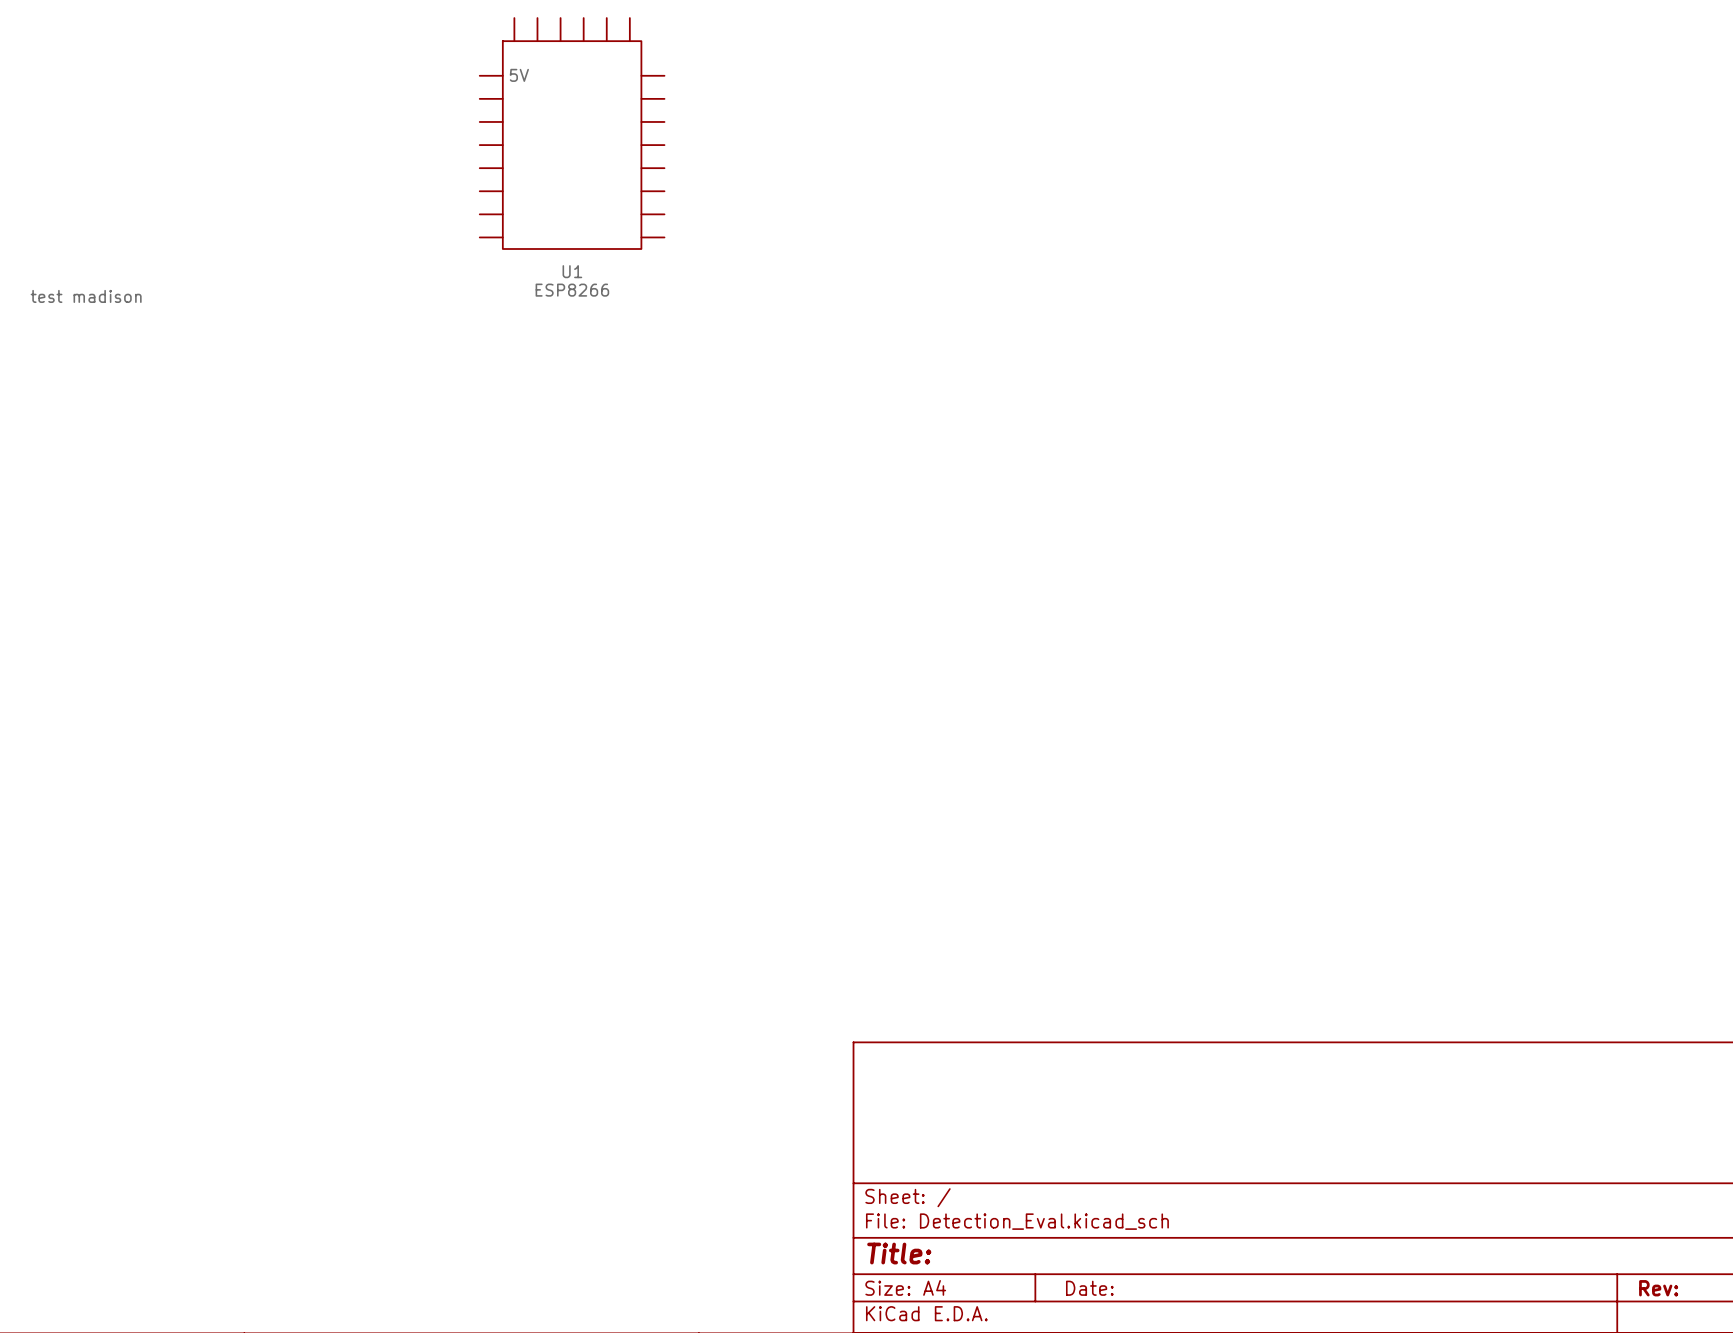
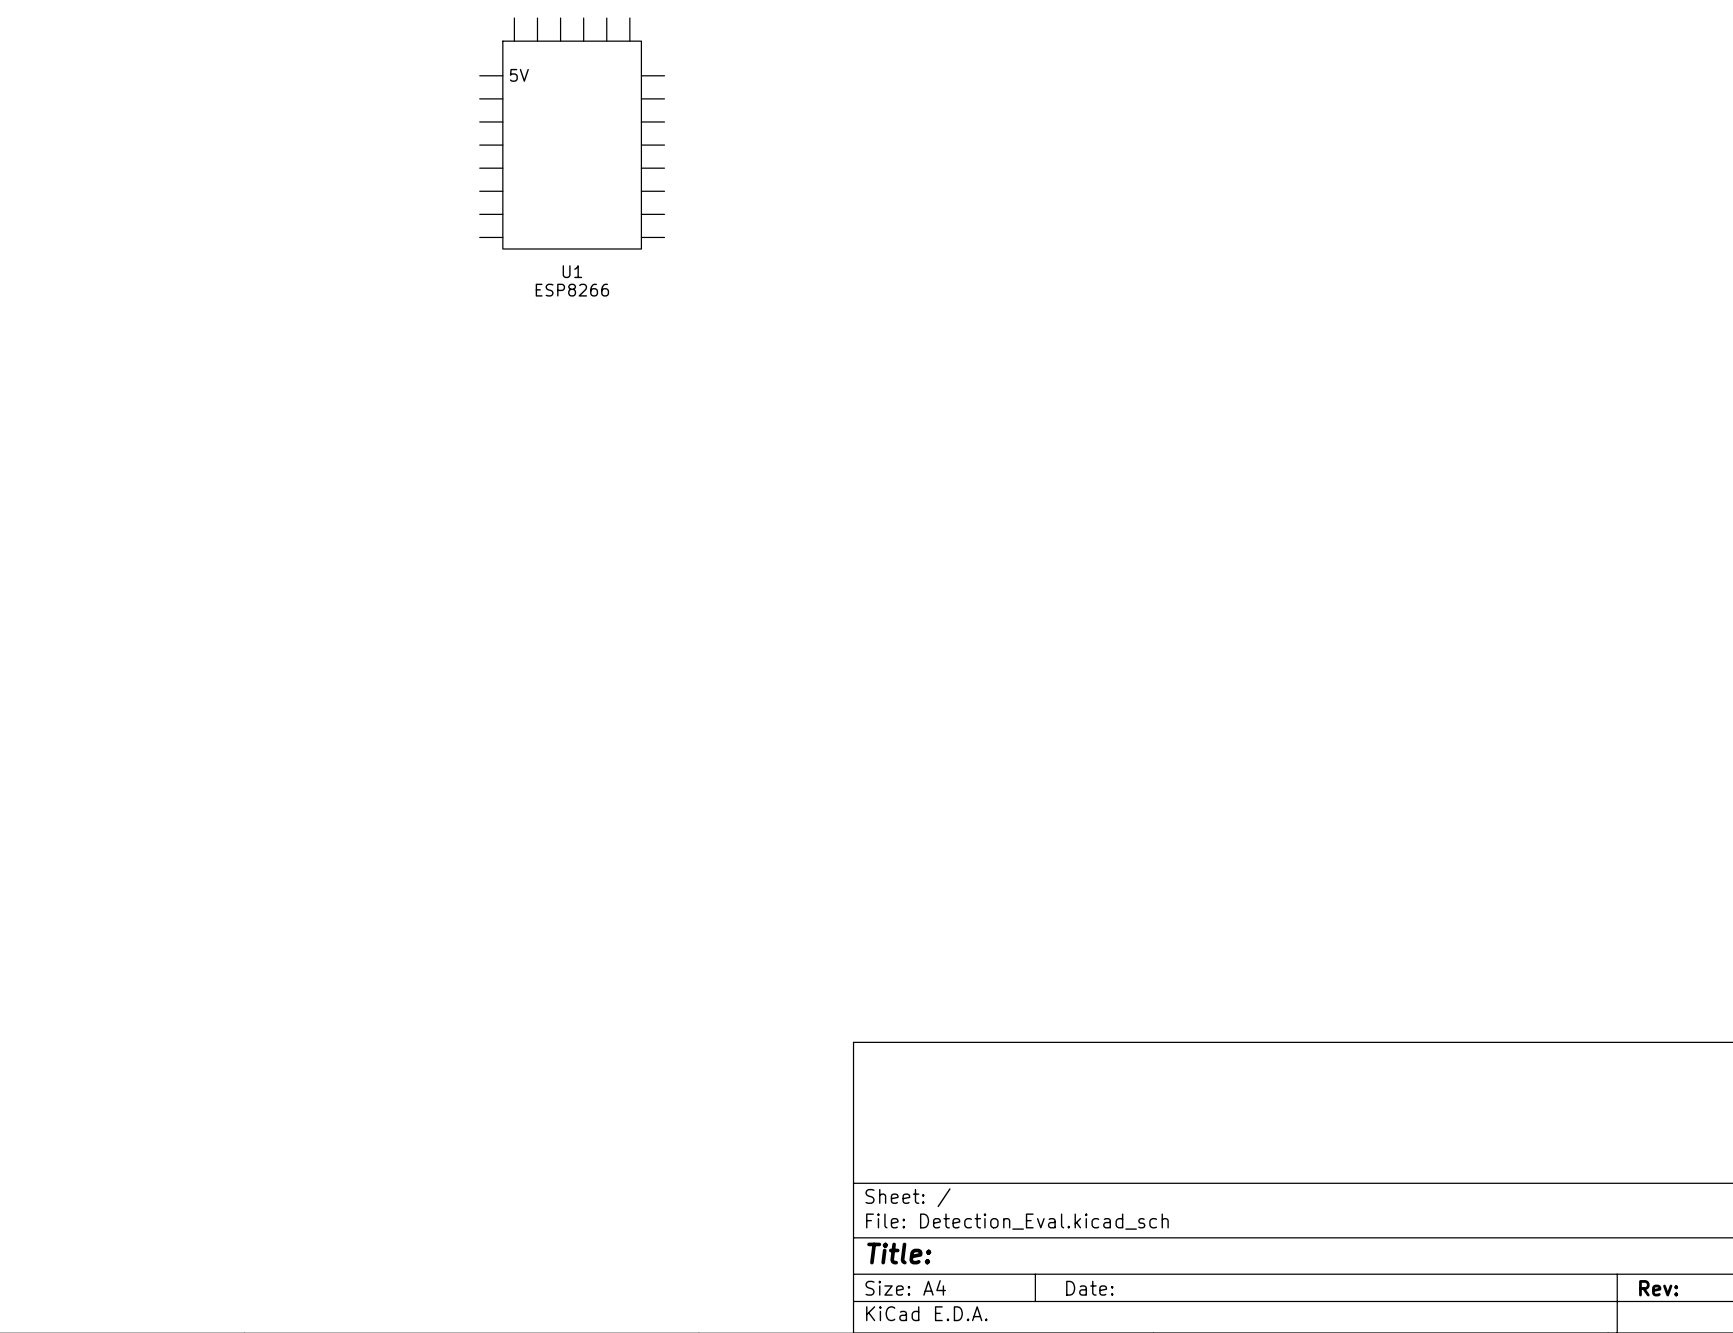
label: test madison (86, 296) -> none

